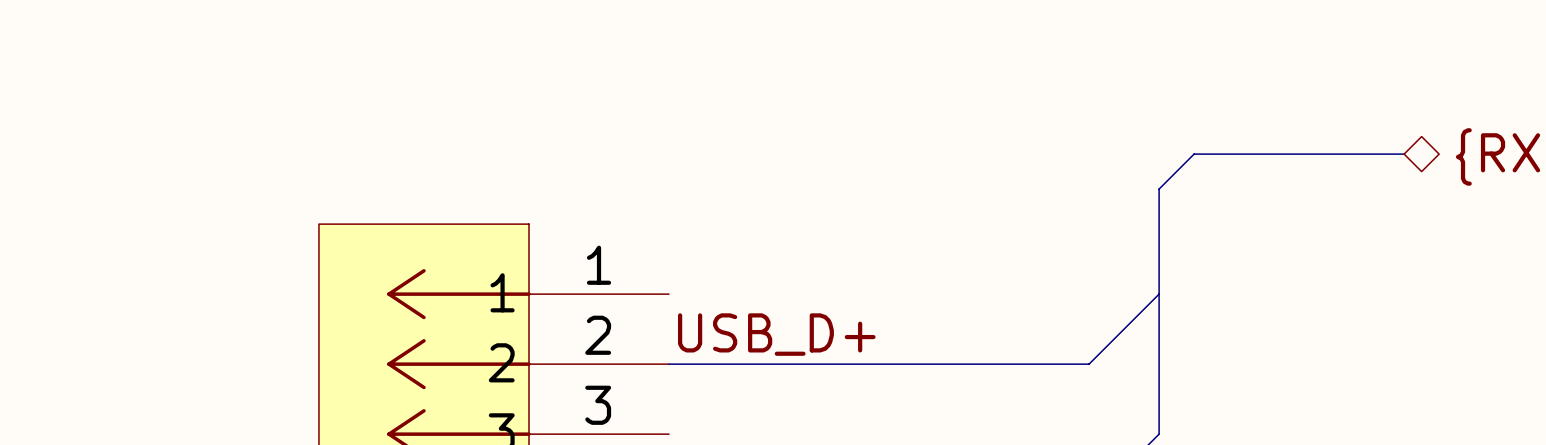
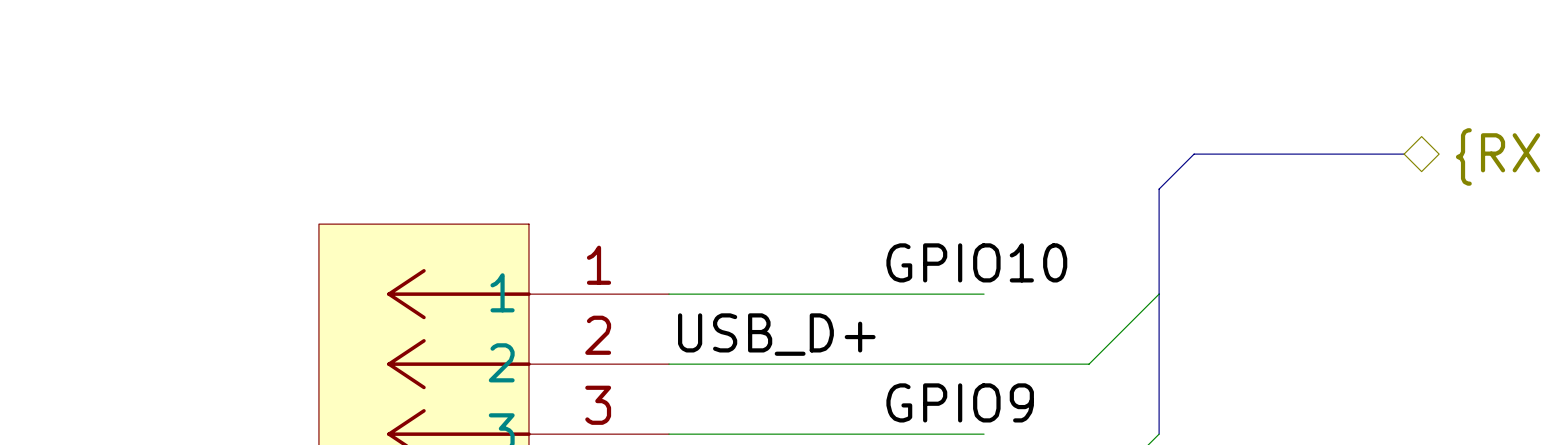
label: none -> GPIO10 (976, 262)
wire: none -> (669, 294) (984, 294)
label: none -> GPIO9 (960, 402)
wire: none -> (669, 434) (984, 434)

